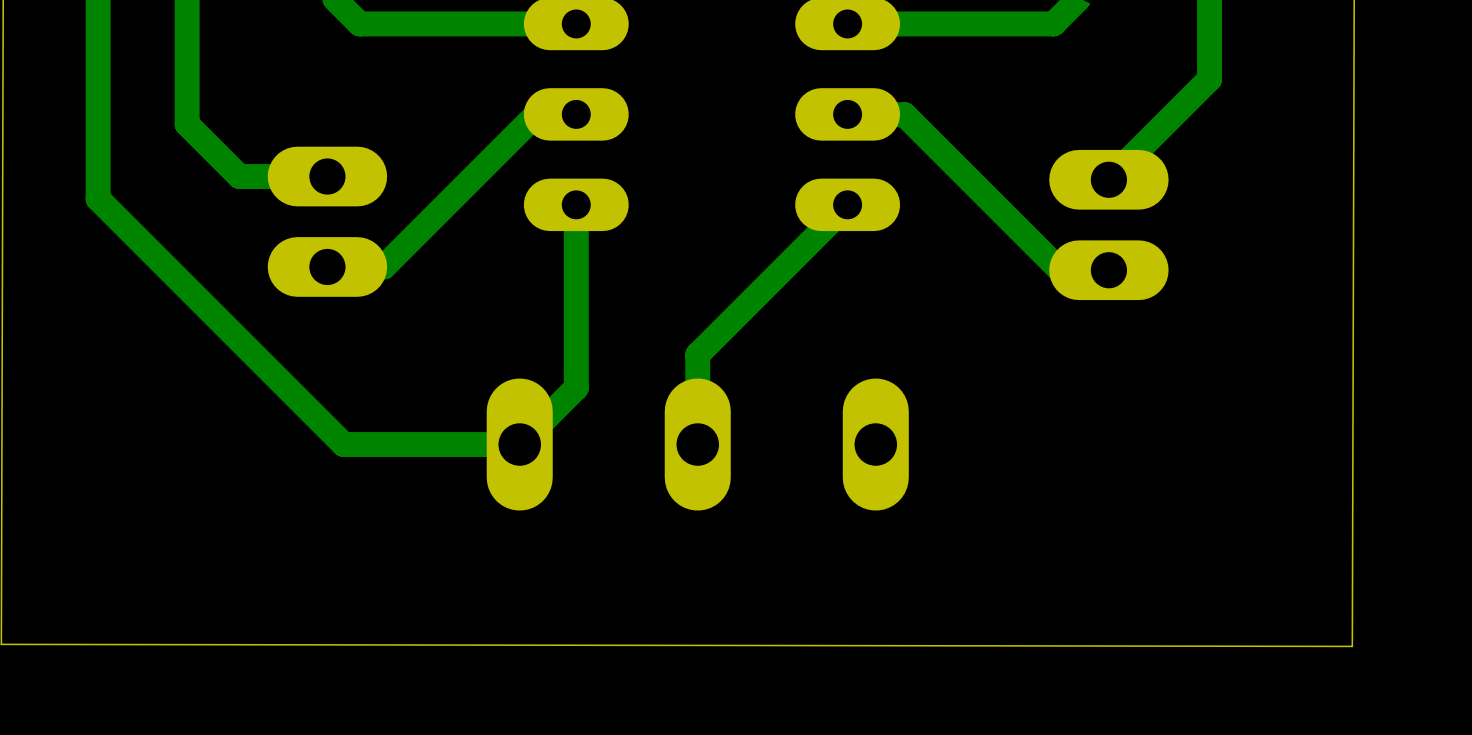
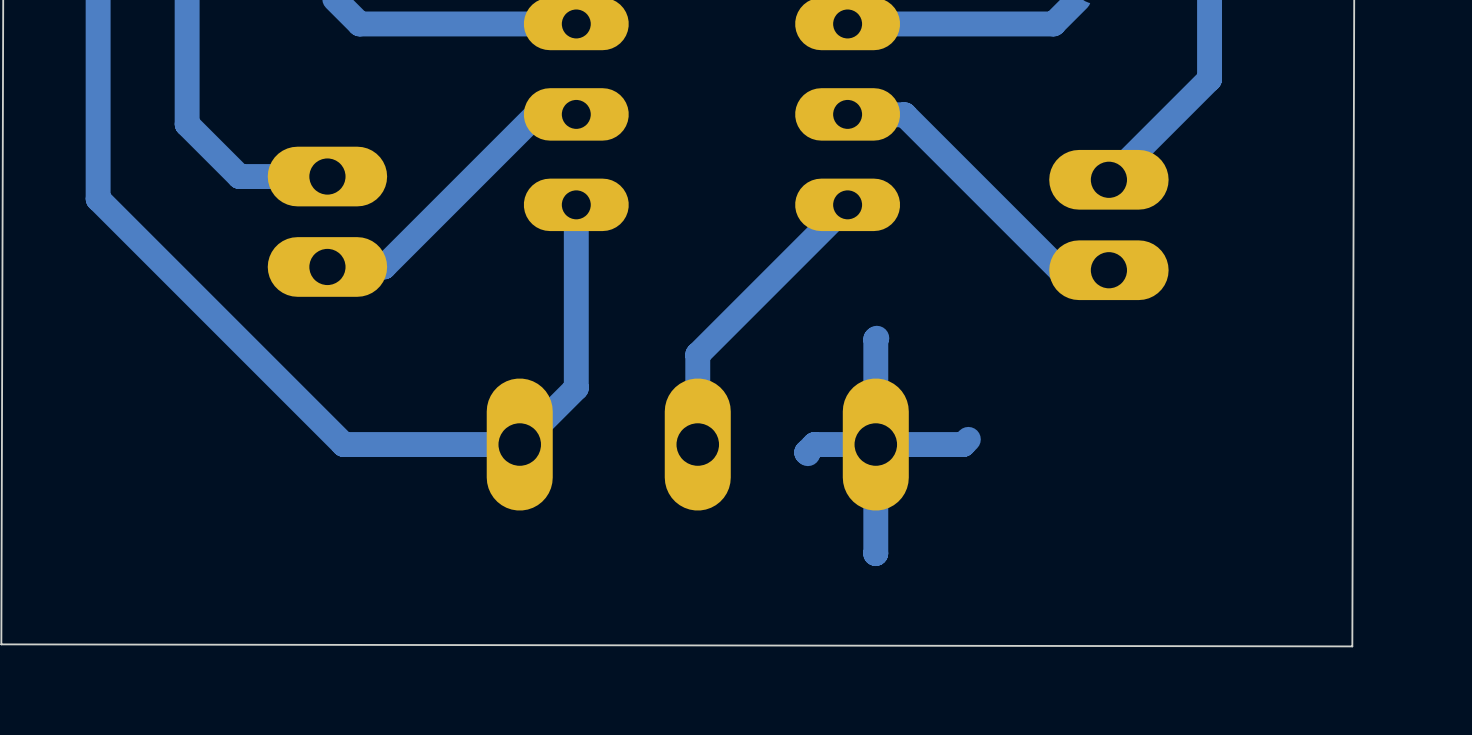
track: none -> (876, 338) (875, 553)
track: none -> (968, 439) (963, 444) (814, 444) (806, 452) (807, 453)

